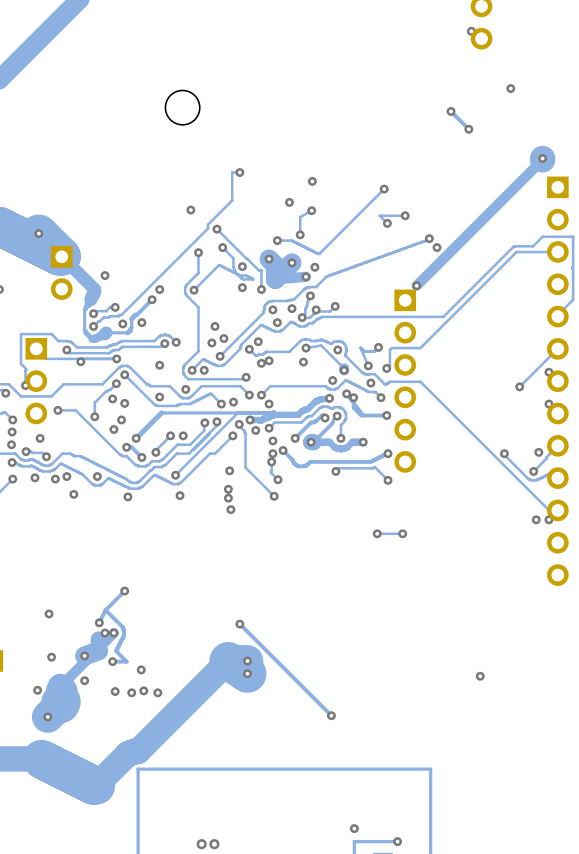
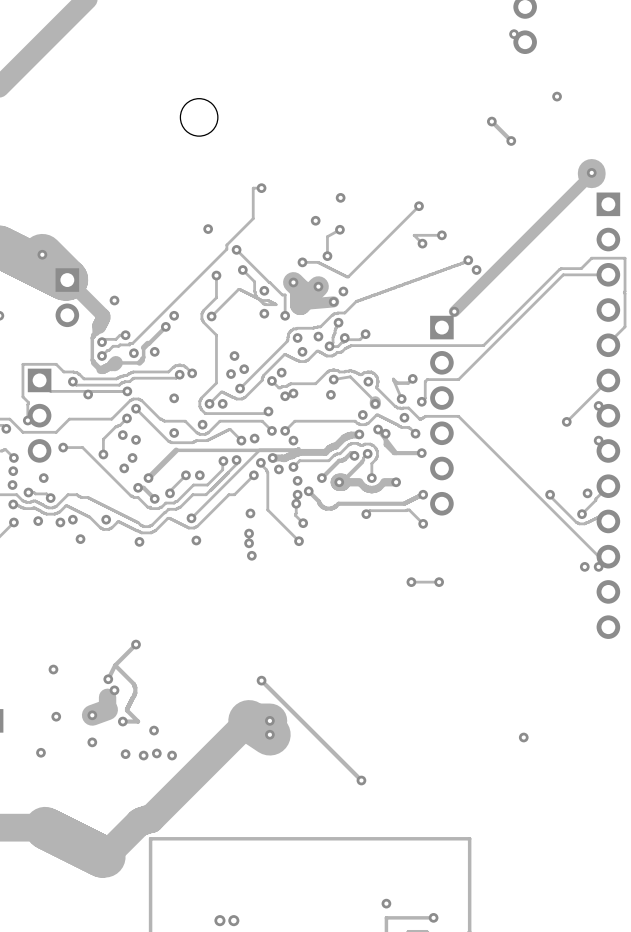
track: (113, 633) (60, 686) (61, 701) (47, 716) -> none
via: (113, 633) -> none
via: (47, 716) -> none

